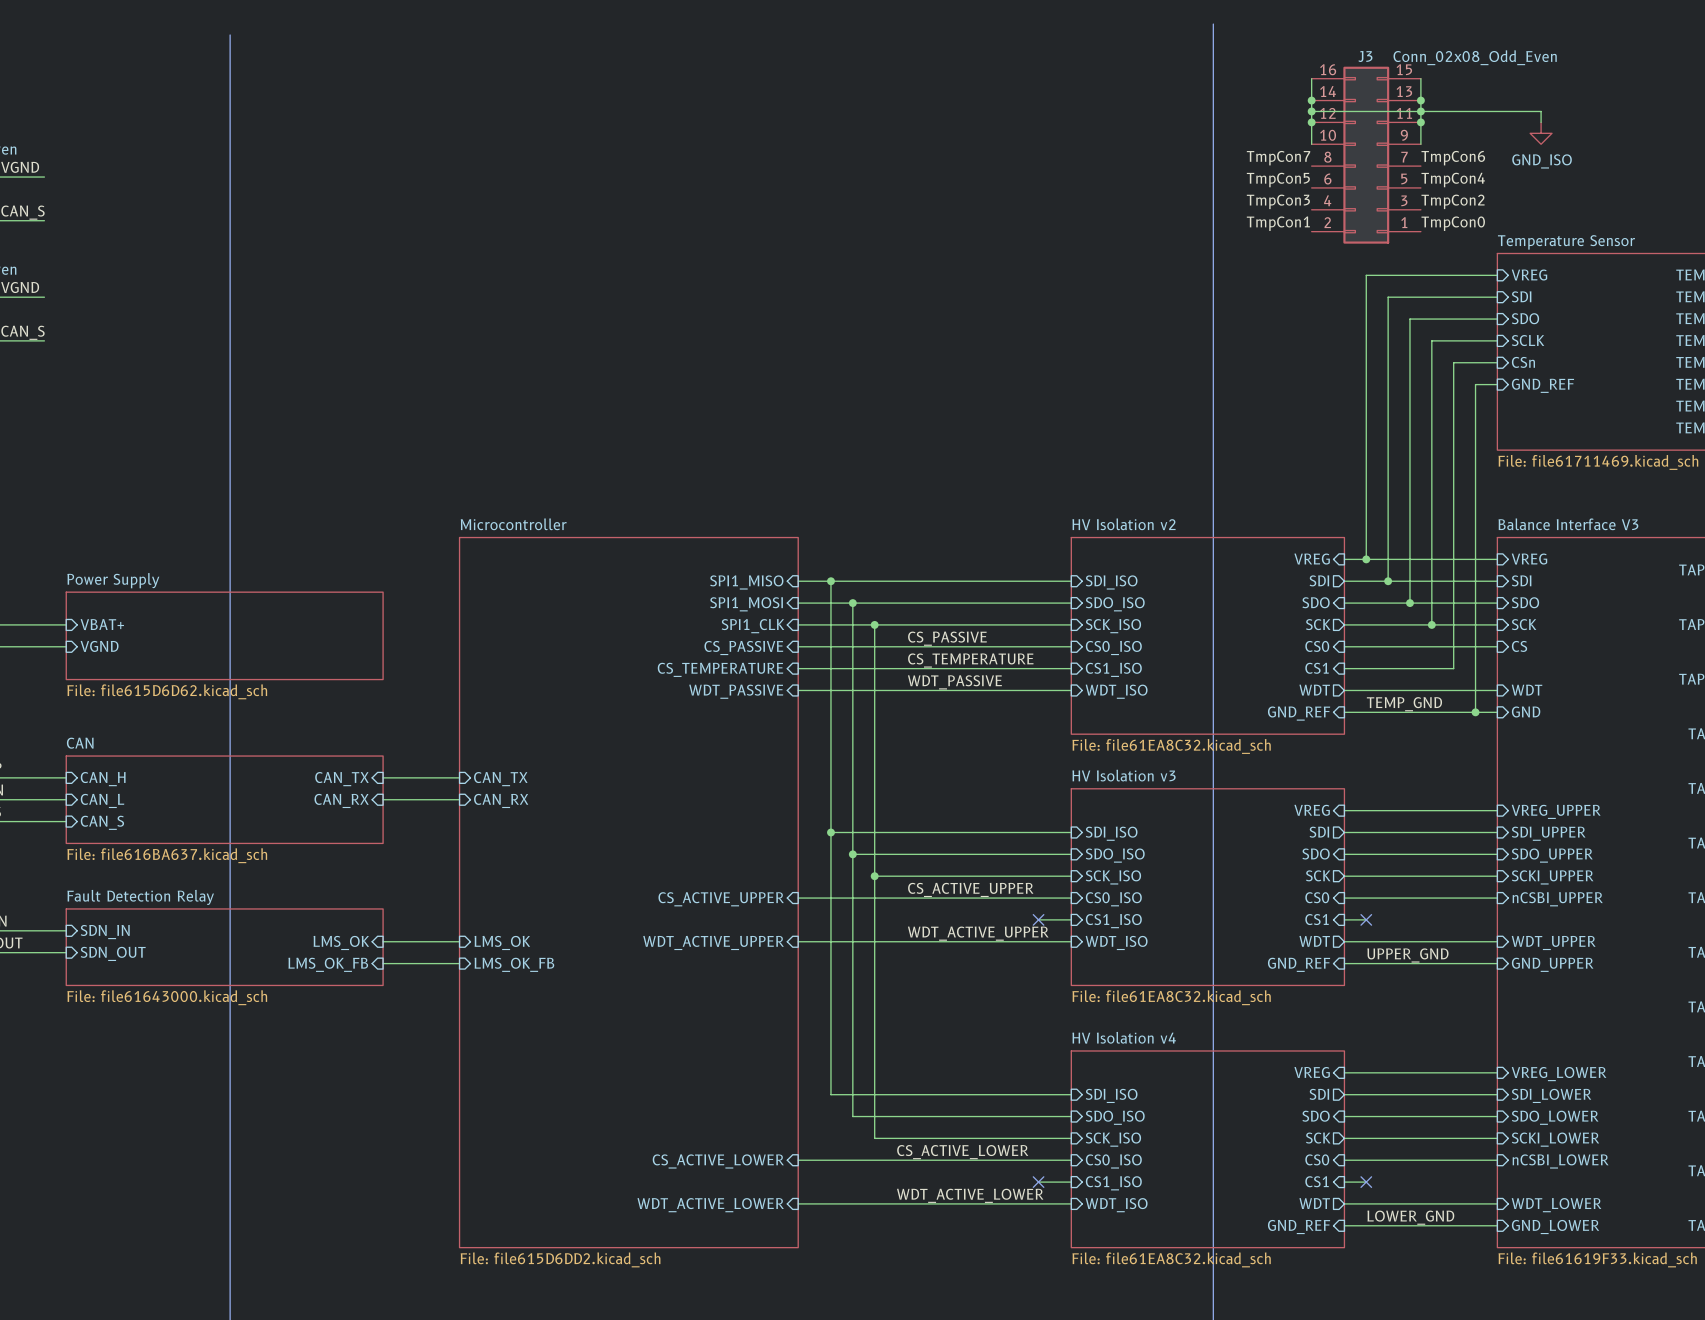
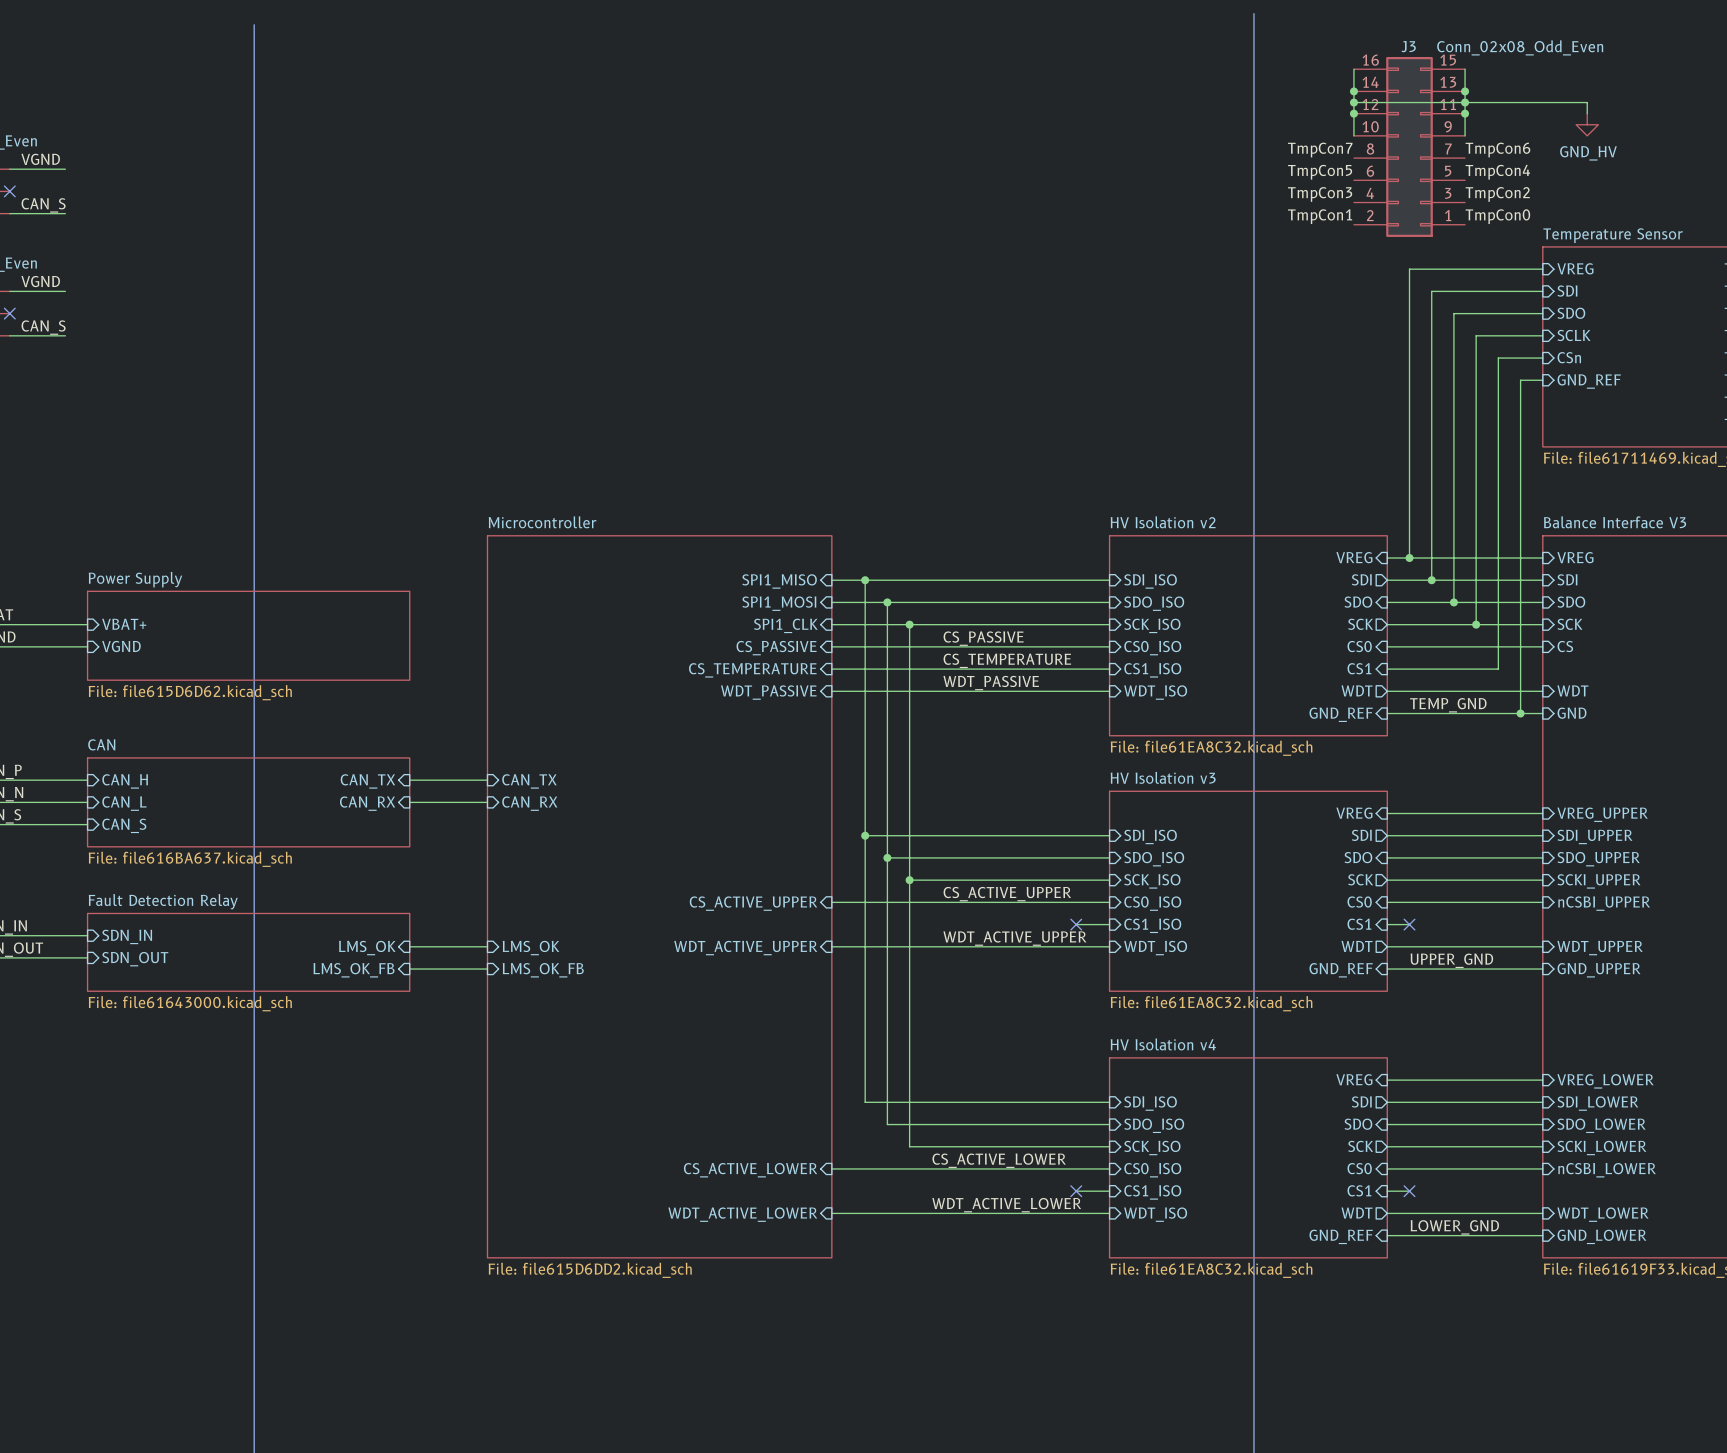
power symbol: GND_ISO (1541, 133) -> GND_HV (1587, 124)

